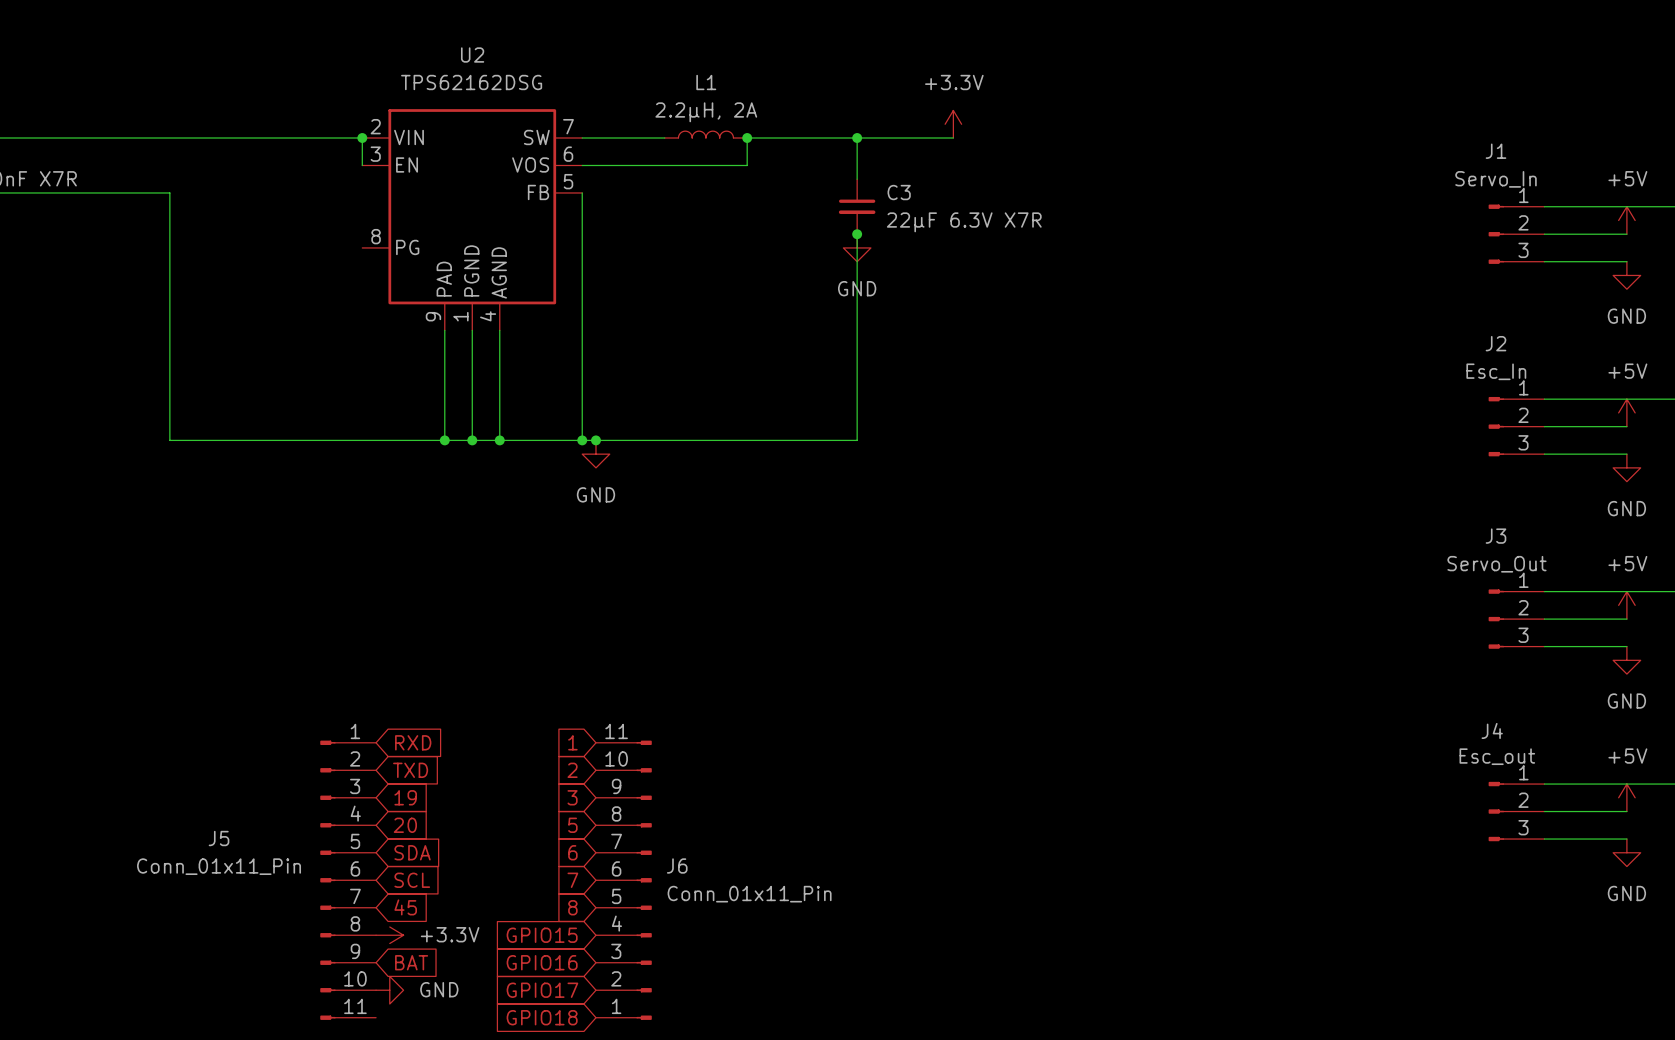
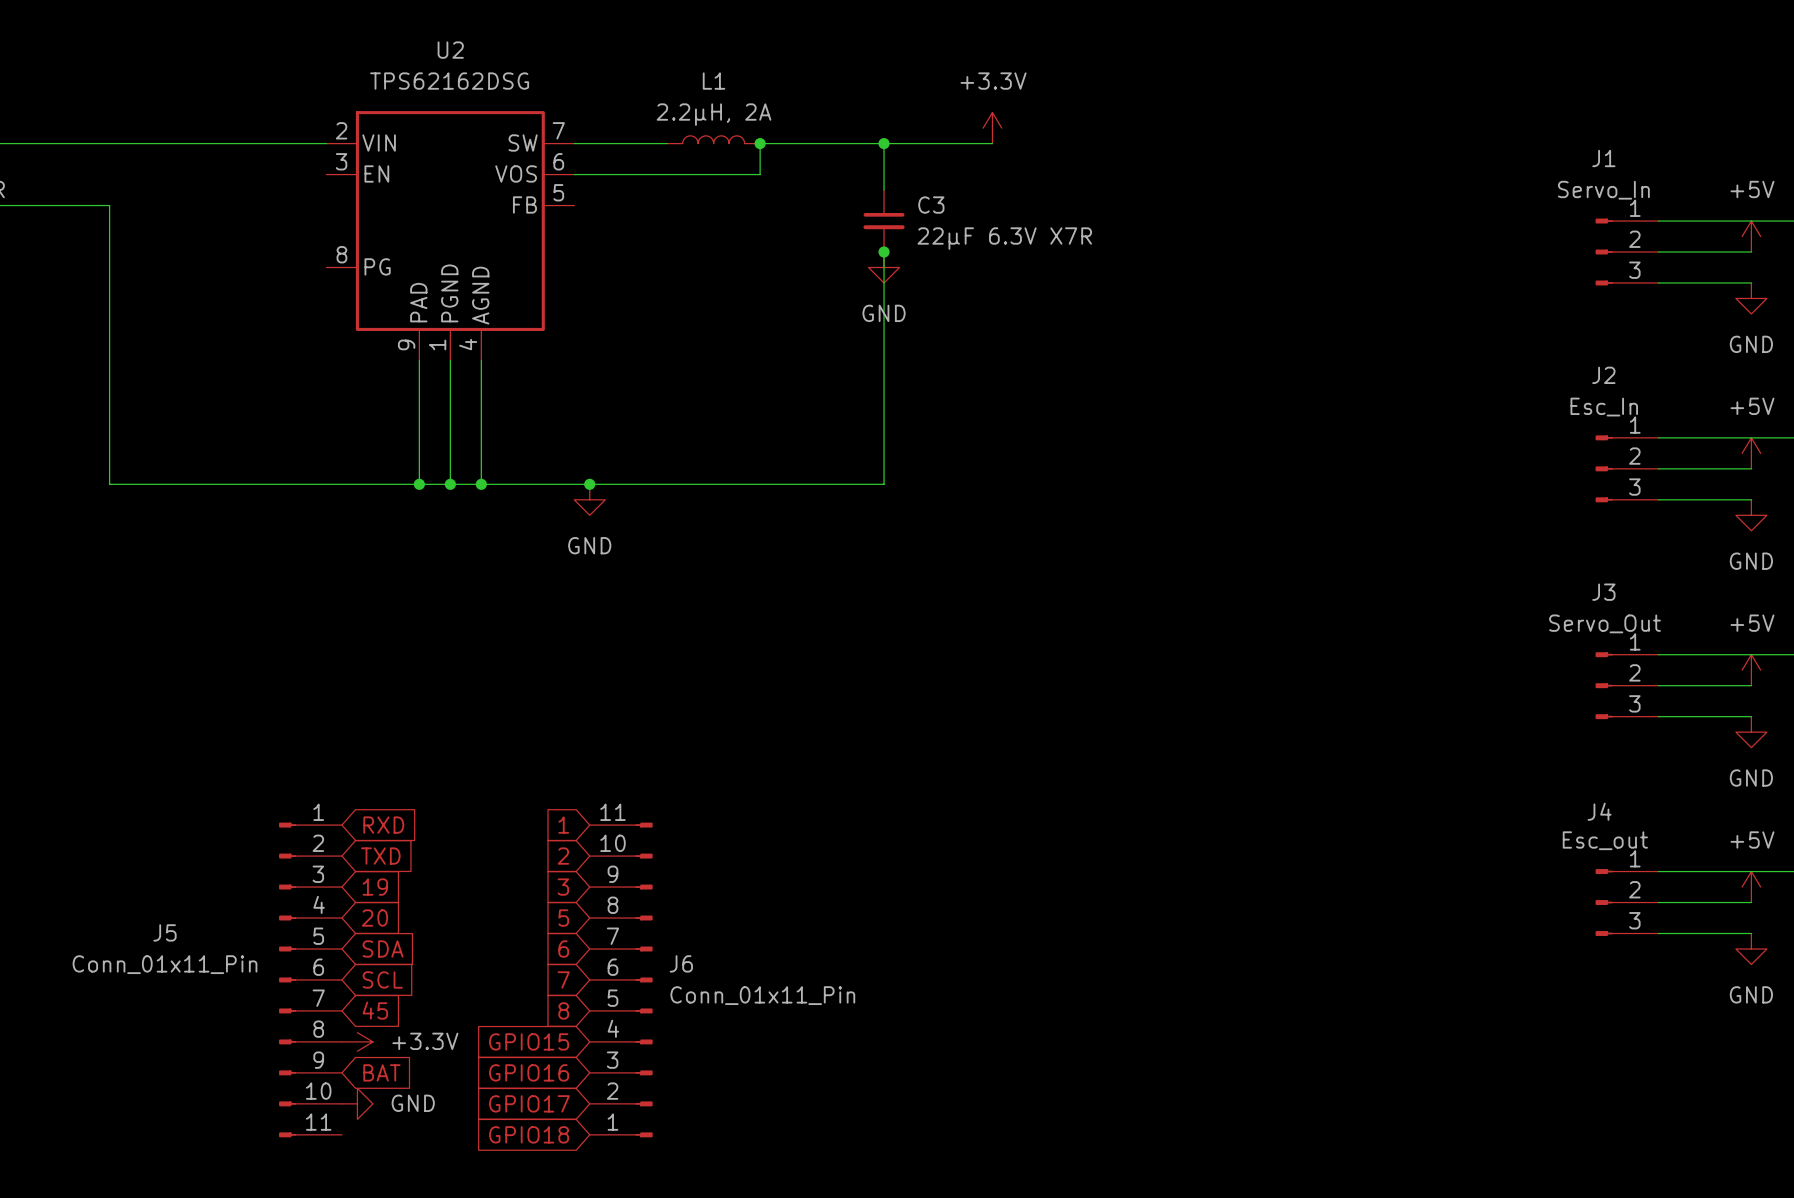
wire: (362, 138) (362, 165) -> none
junction: (362, 138) -> none
wire: (582, 192) (582, 440) -> none
junction: (582, 440) -> none

